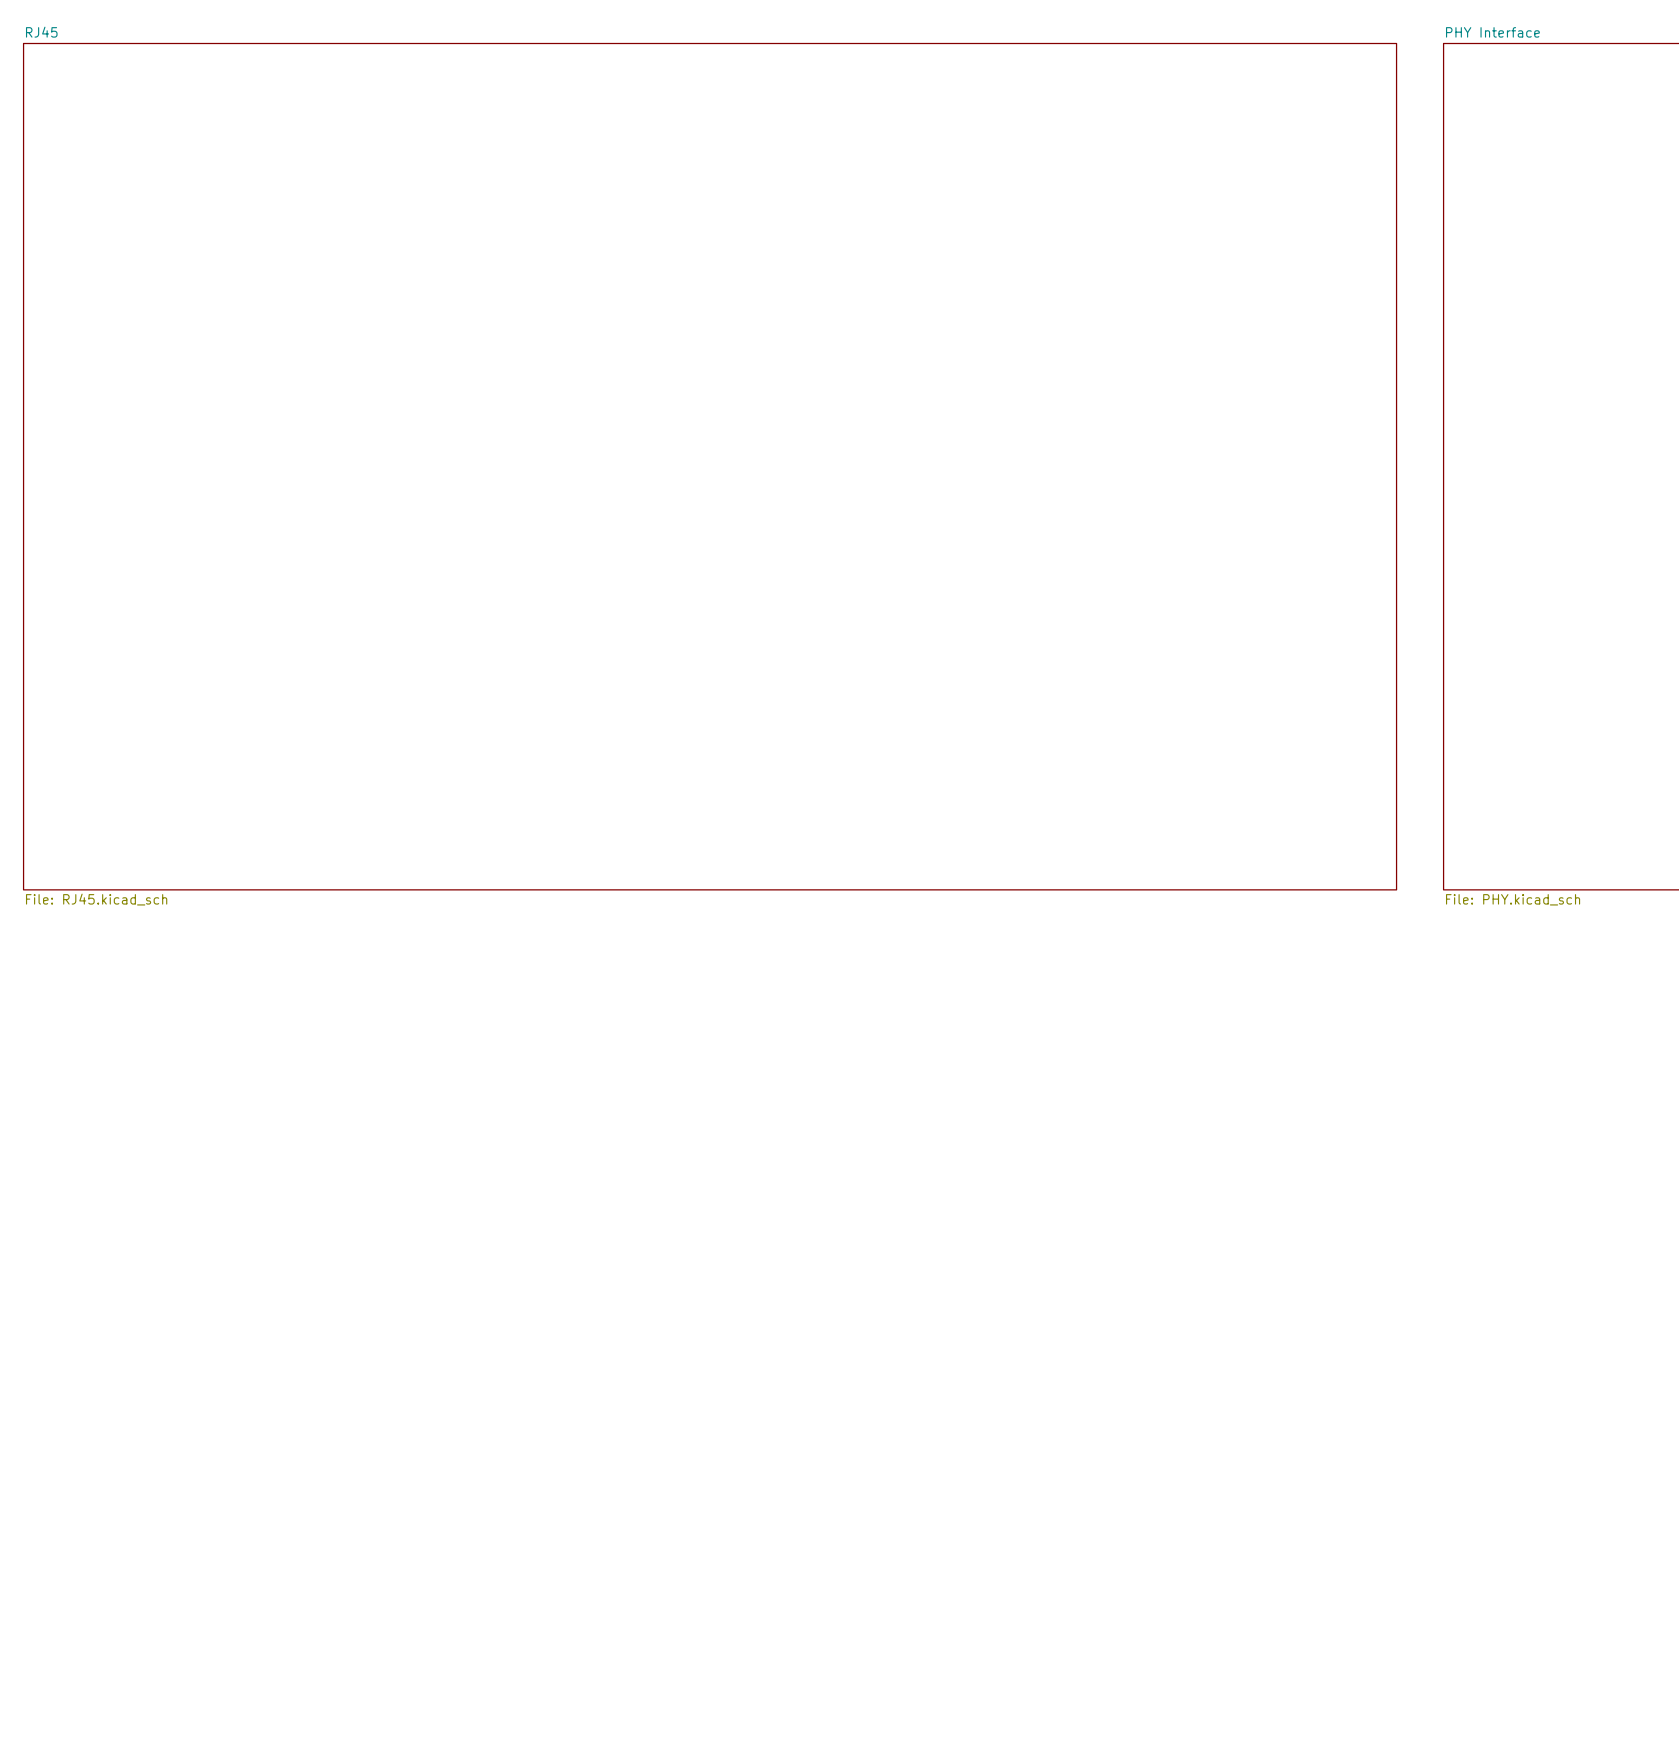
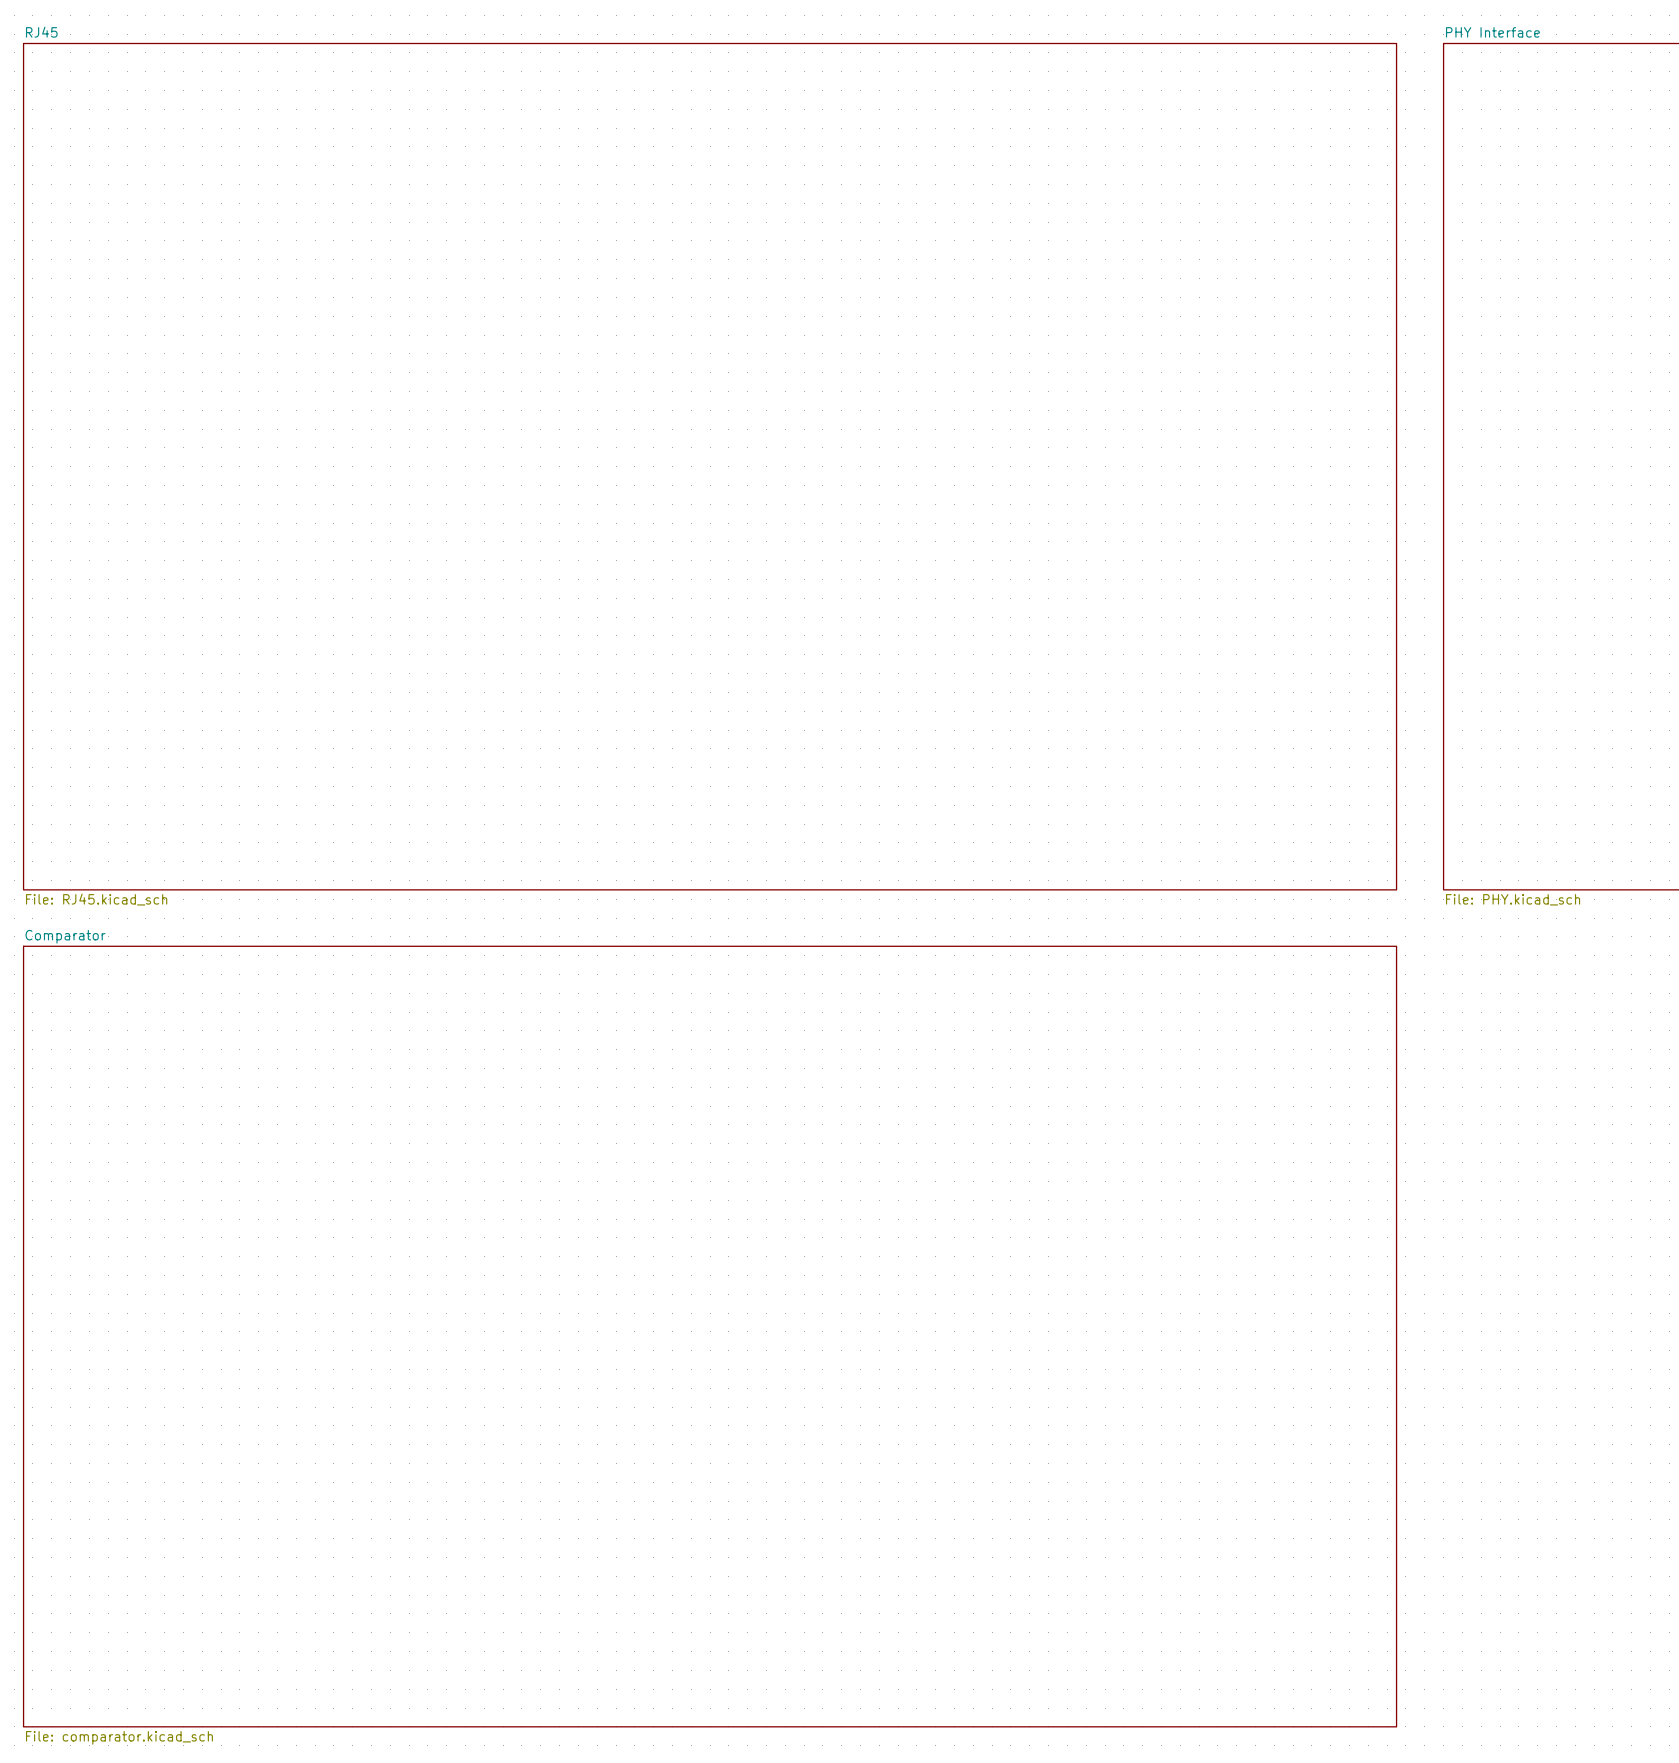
sheet Comparator: none -> File: comparator.kicad_sch (710, 1336)

